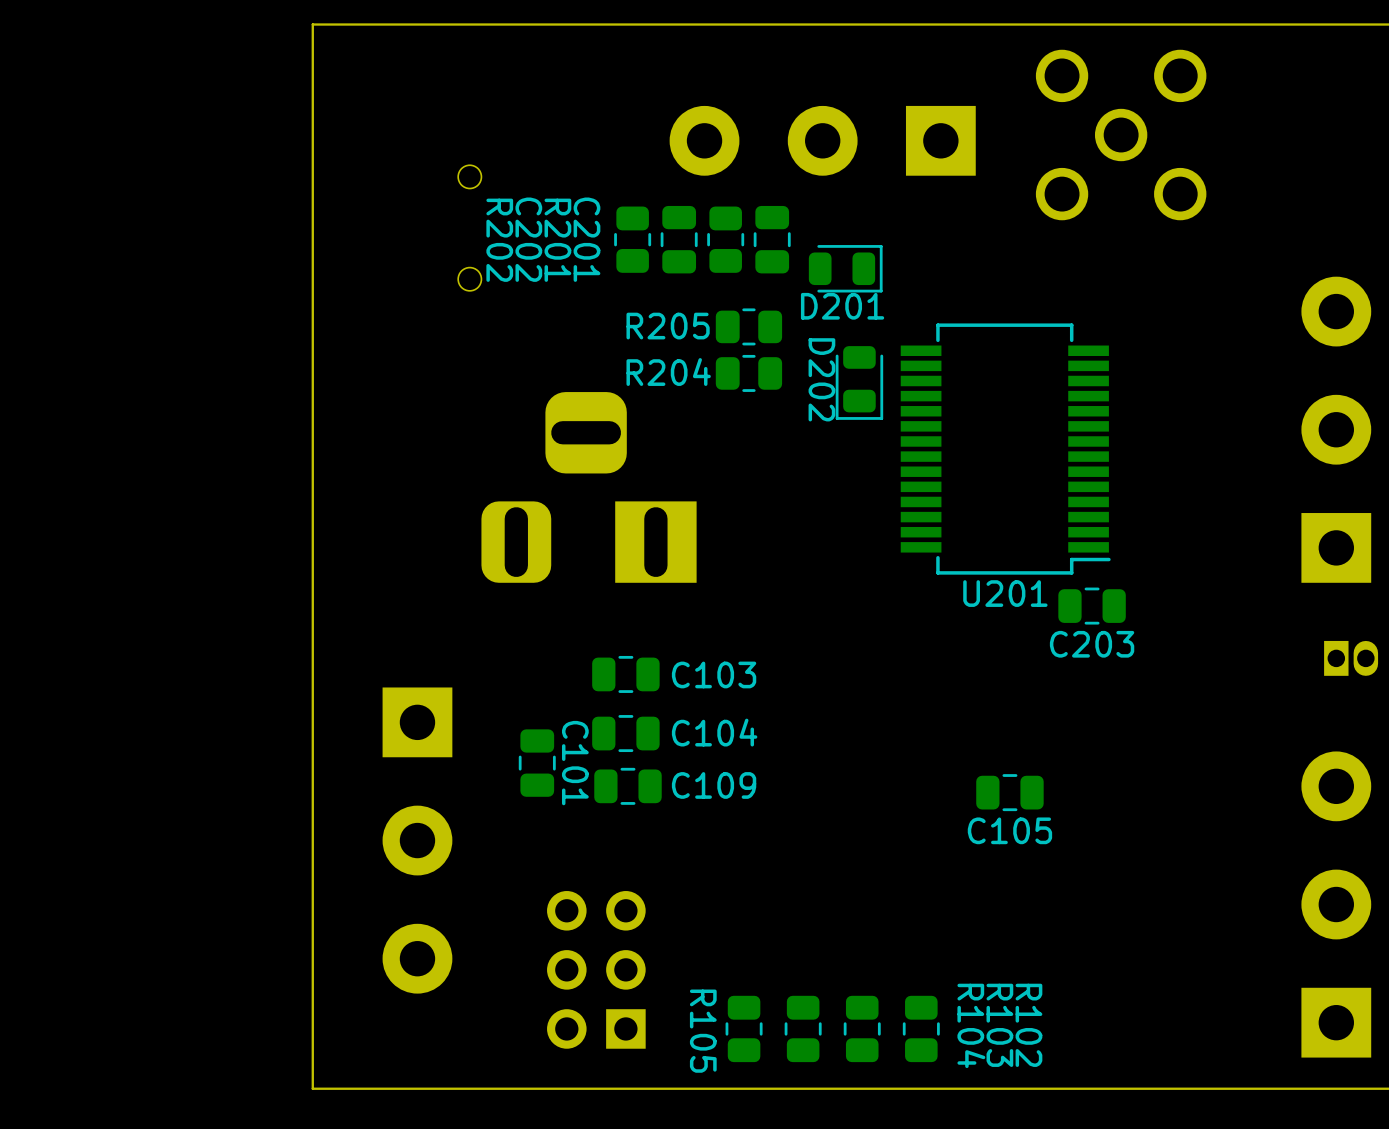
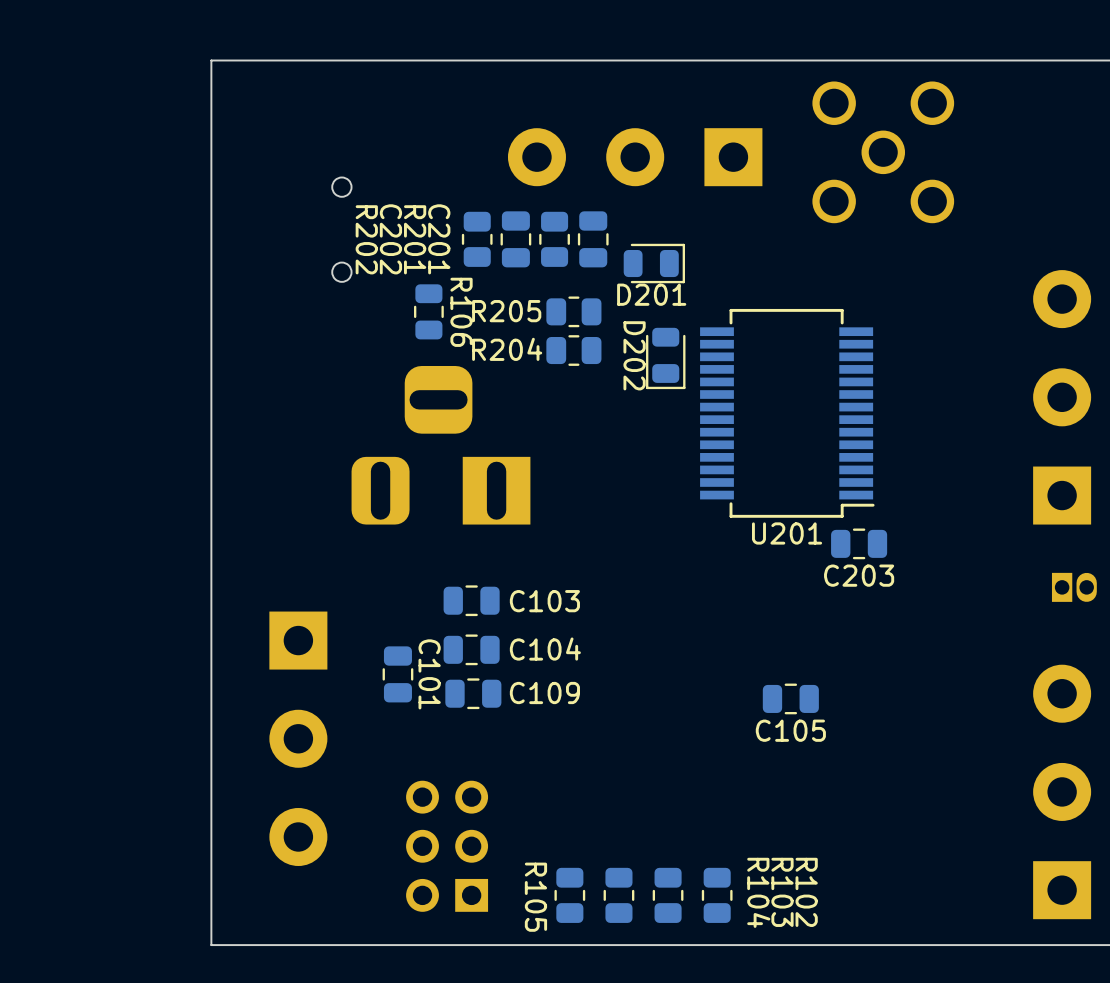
R106: none -> (428, 311)

